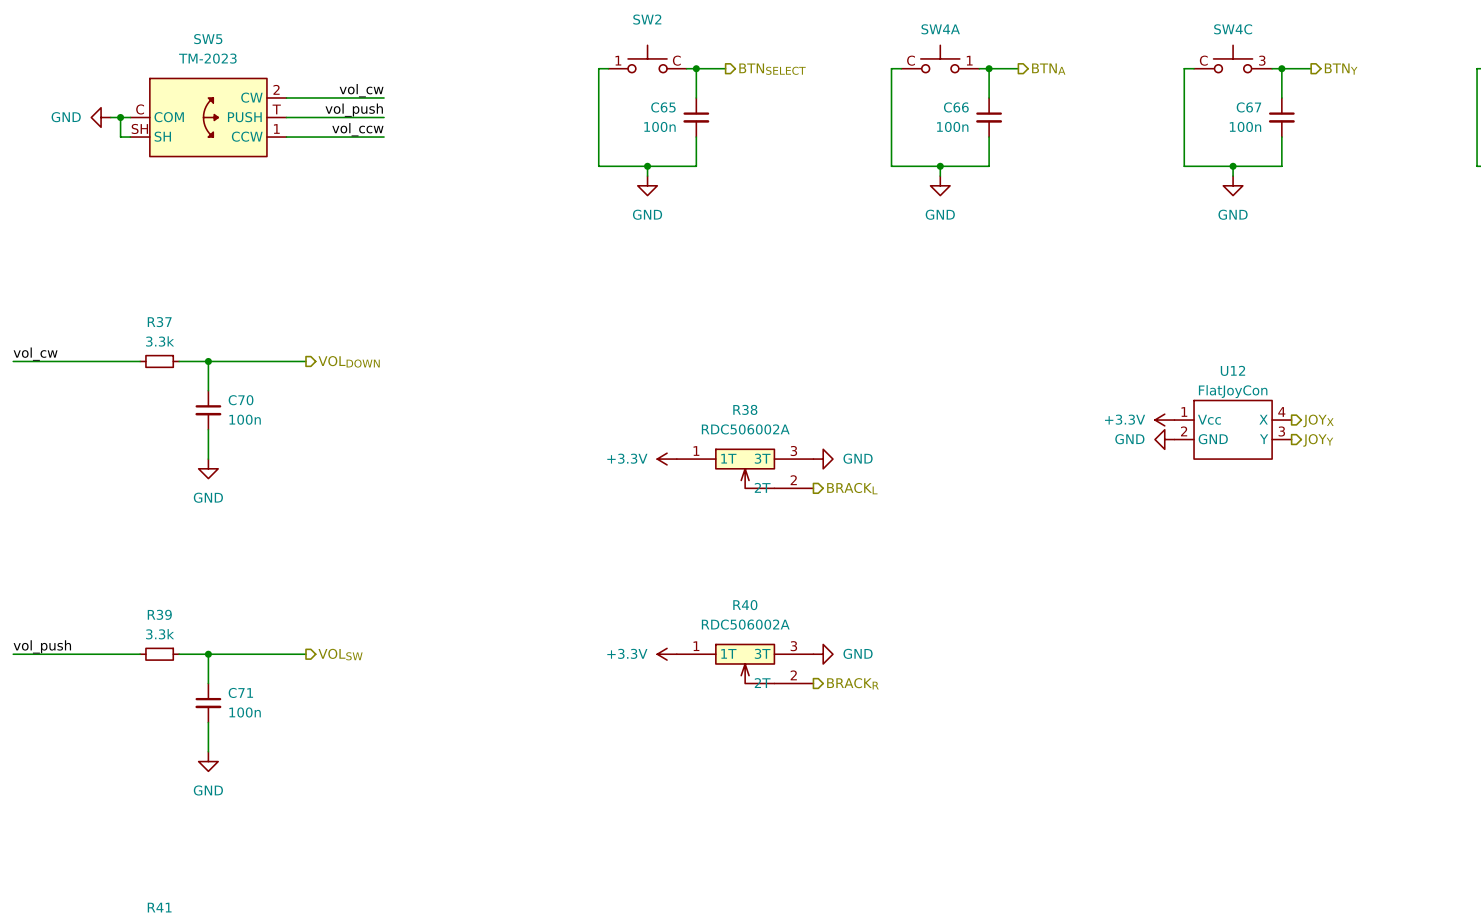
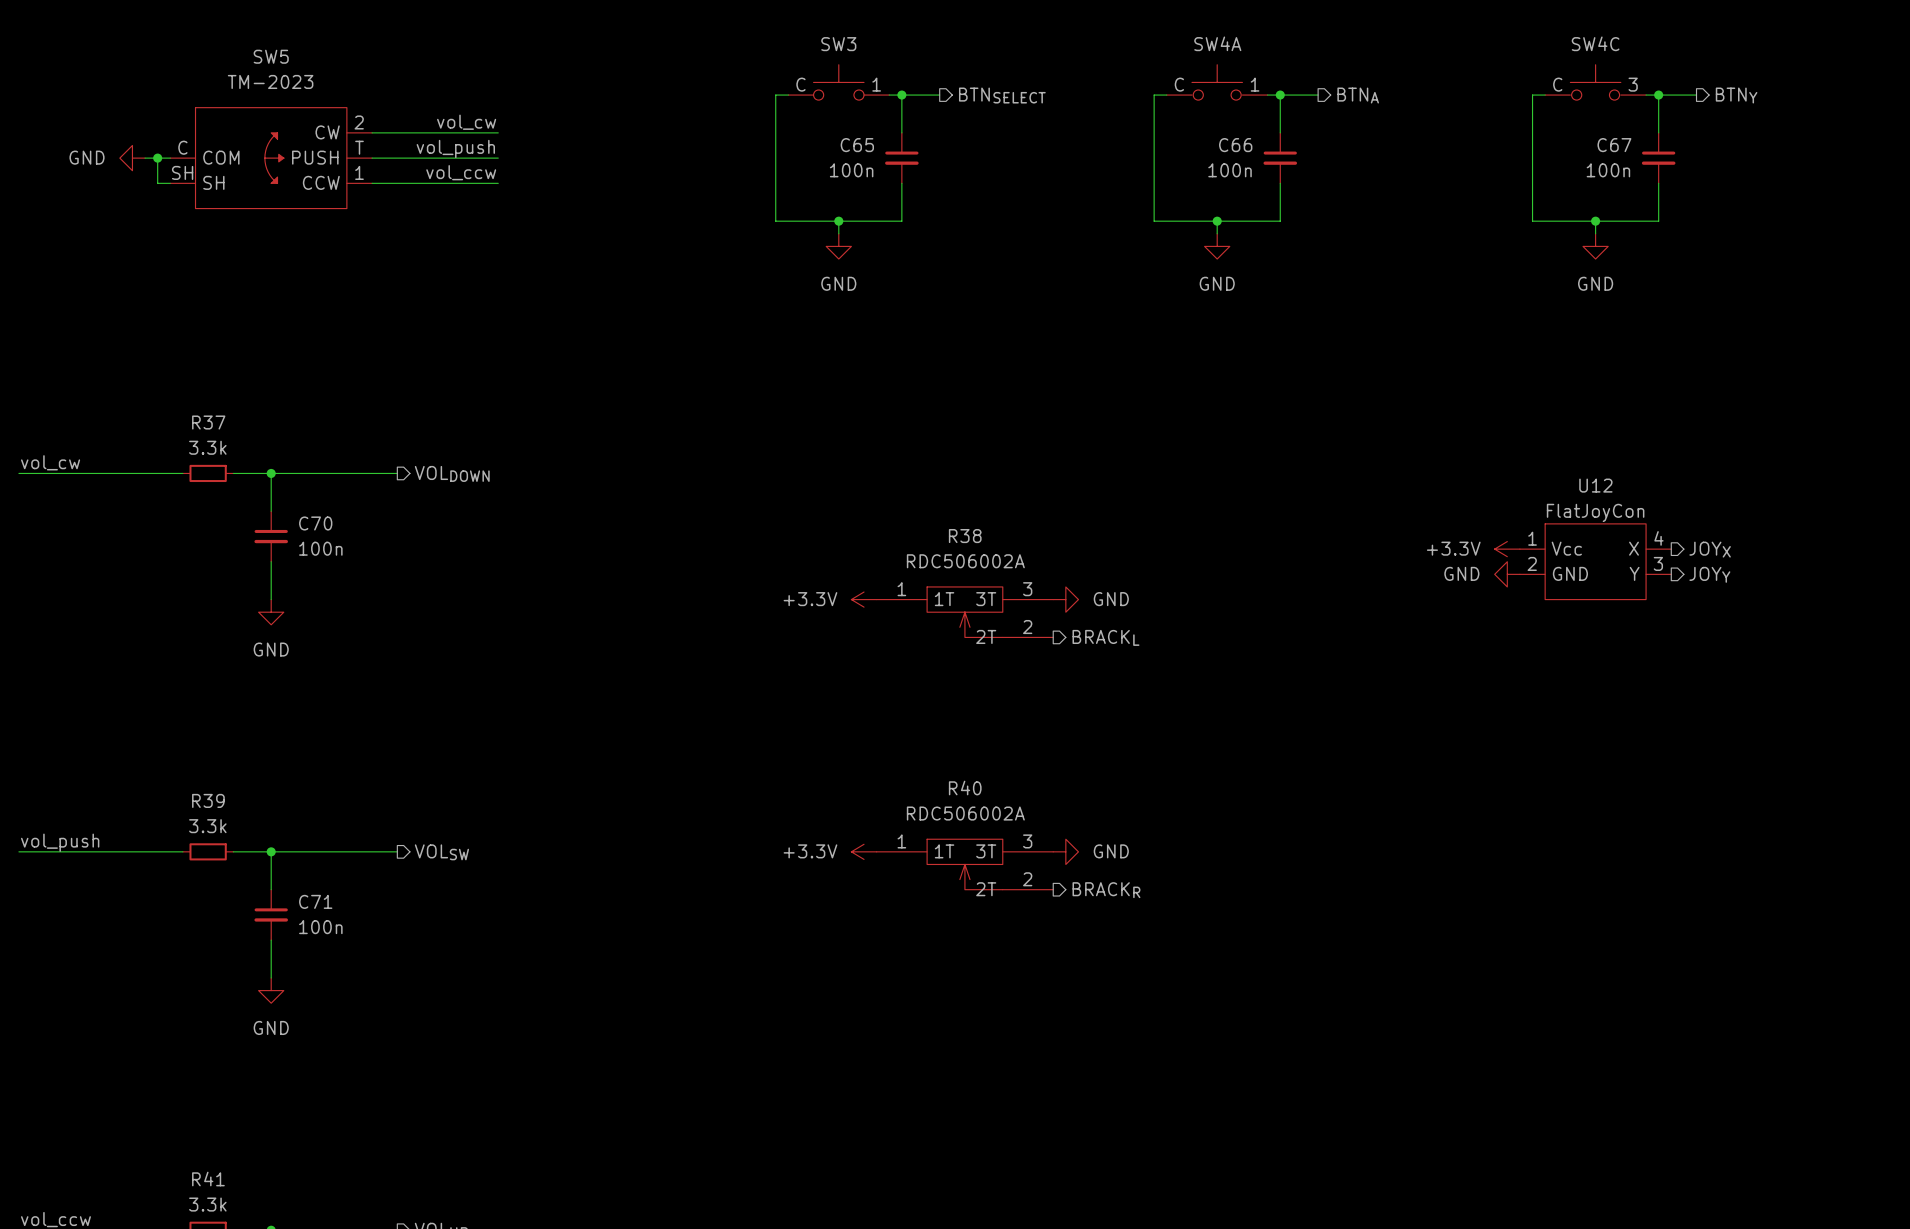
SW2 name: SW2 (647, 19) -> SW3 (838, 44)
SW2 flip: as is (647, 58) -> left-right (838, 82)

